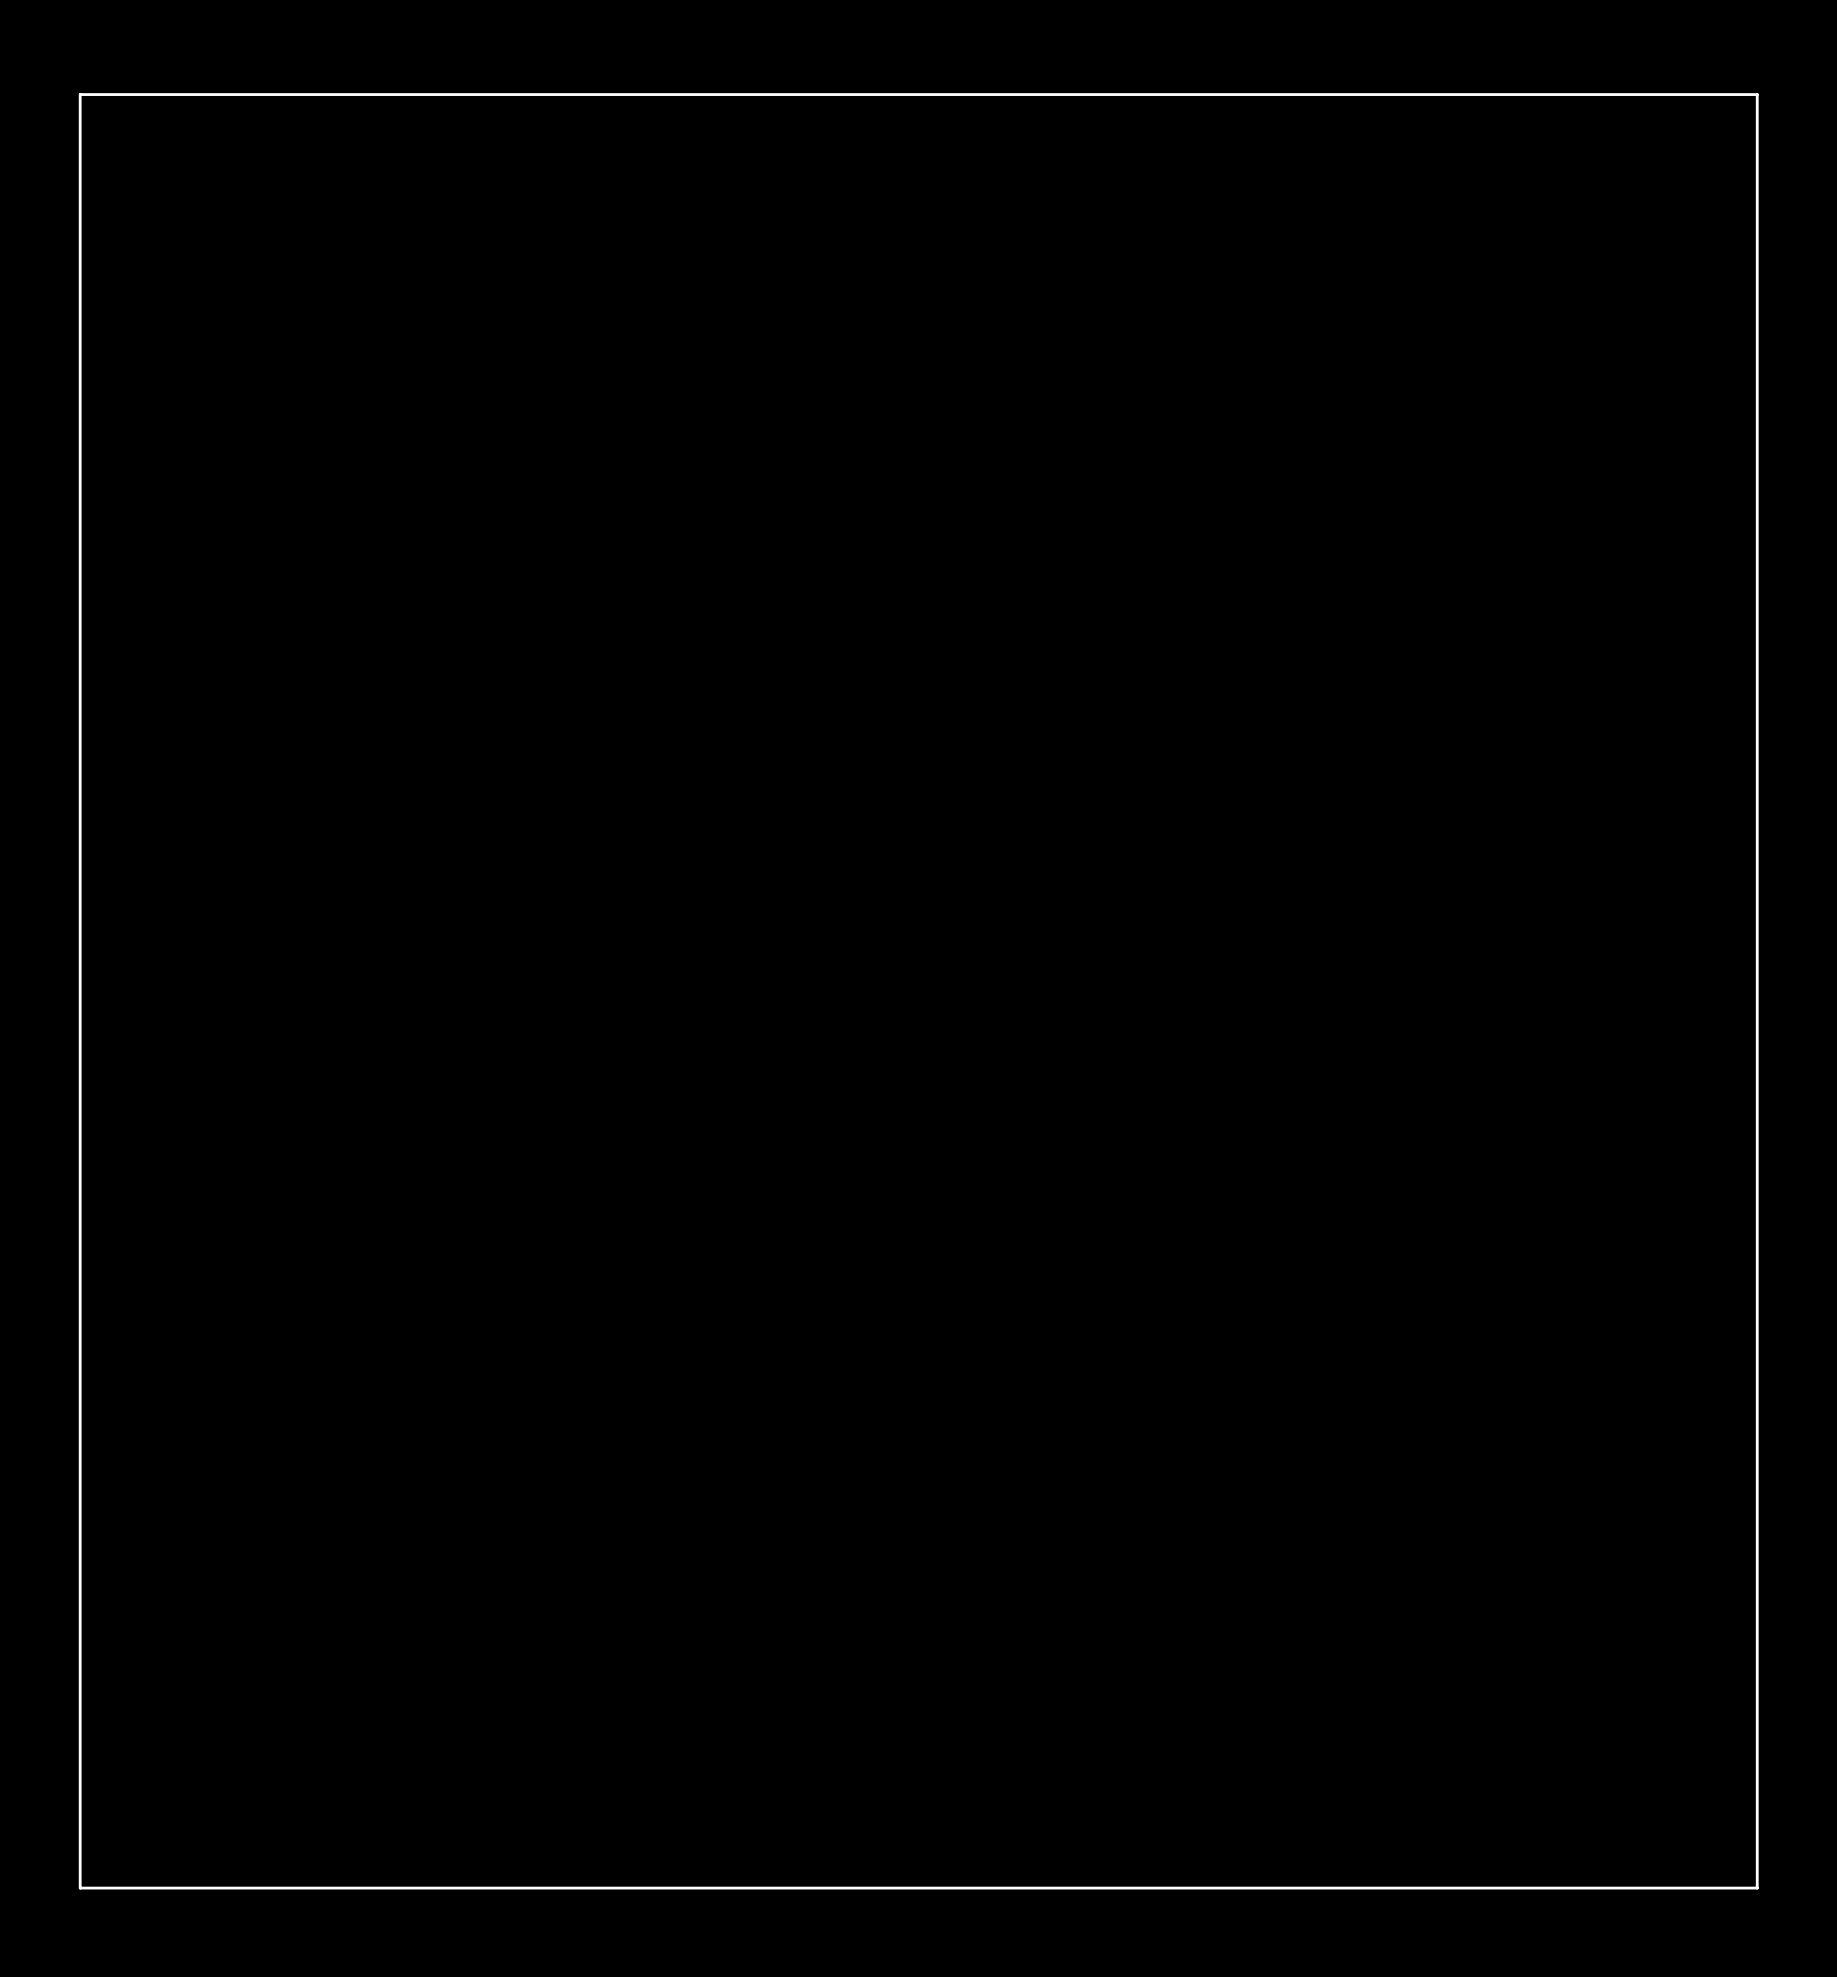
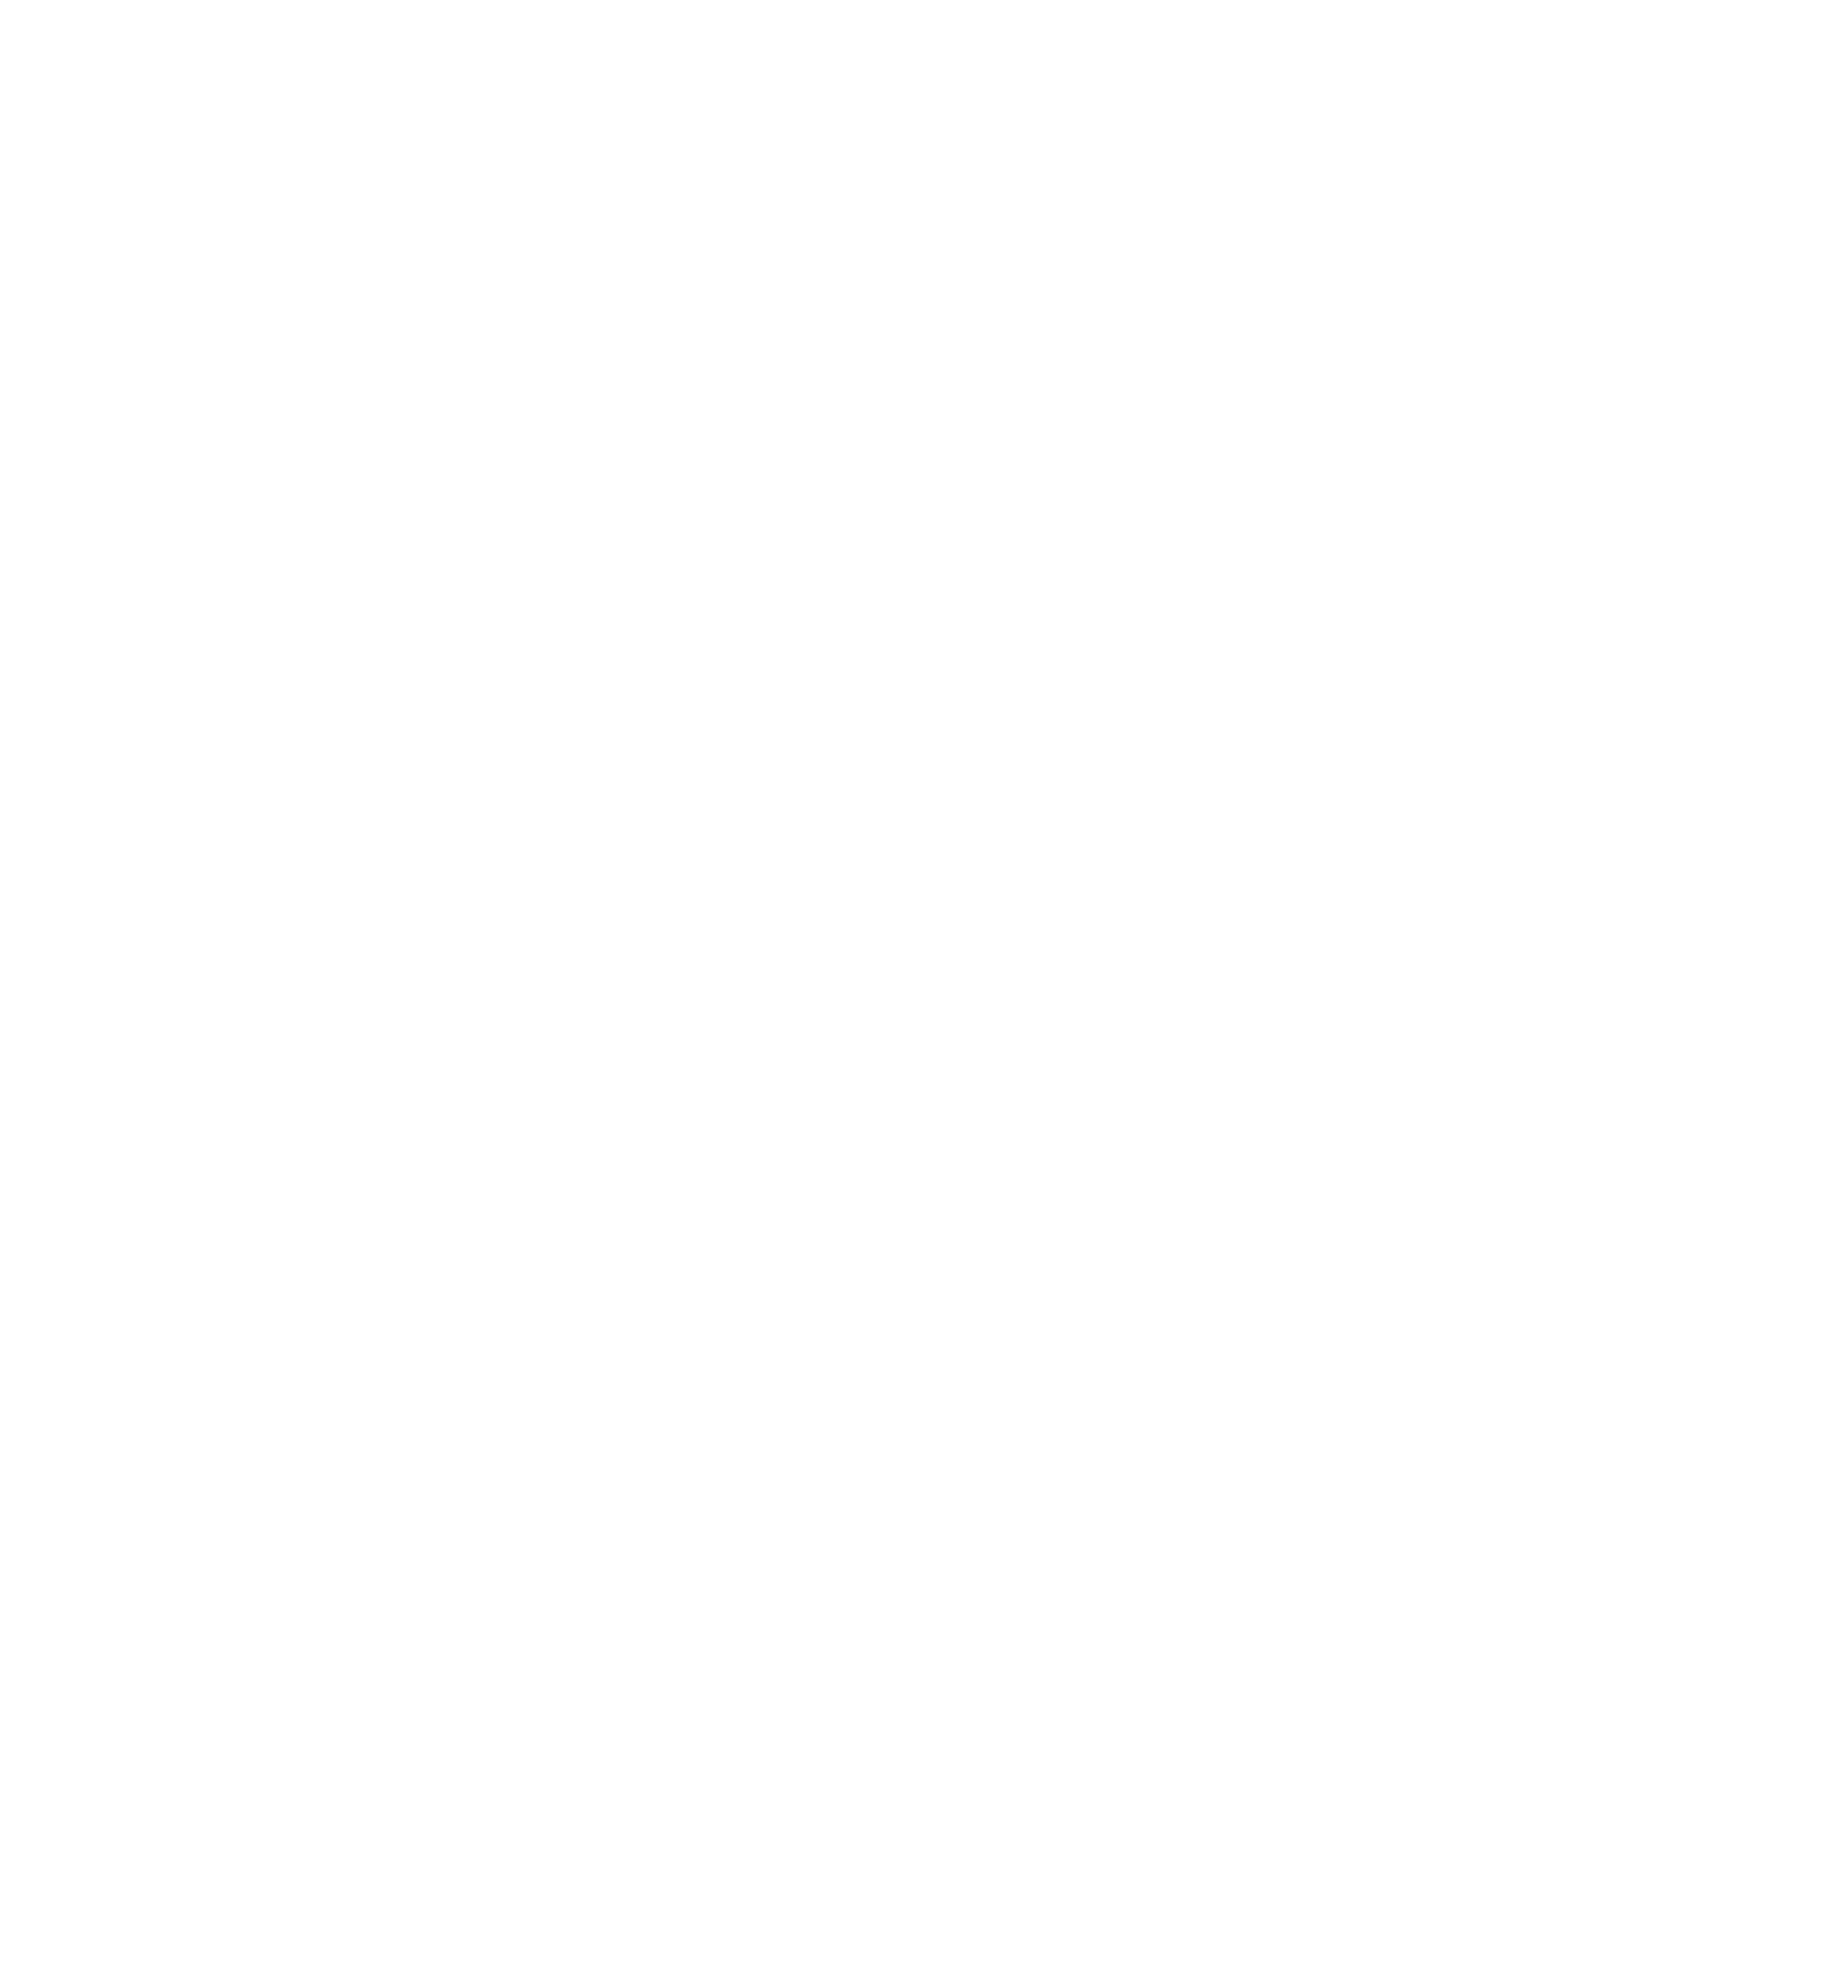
board edge: (1757, 94) (80, 94) (80, 1888) (1757, 1888) (1757, 94) -> none

